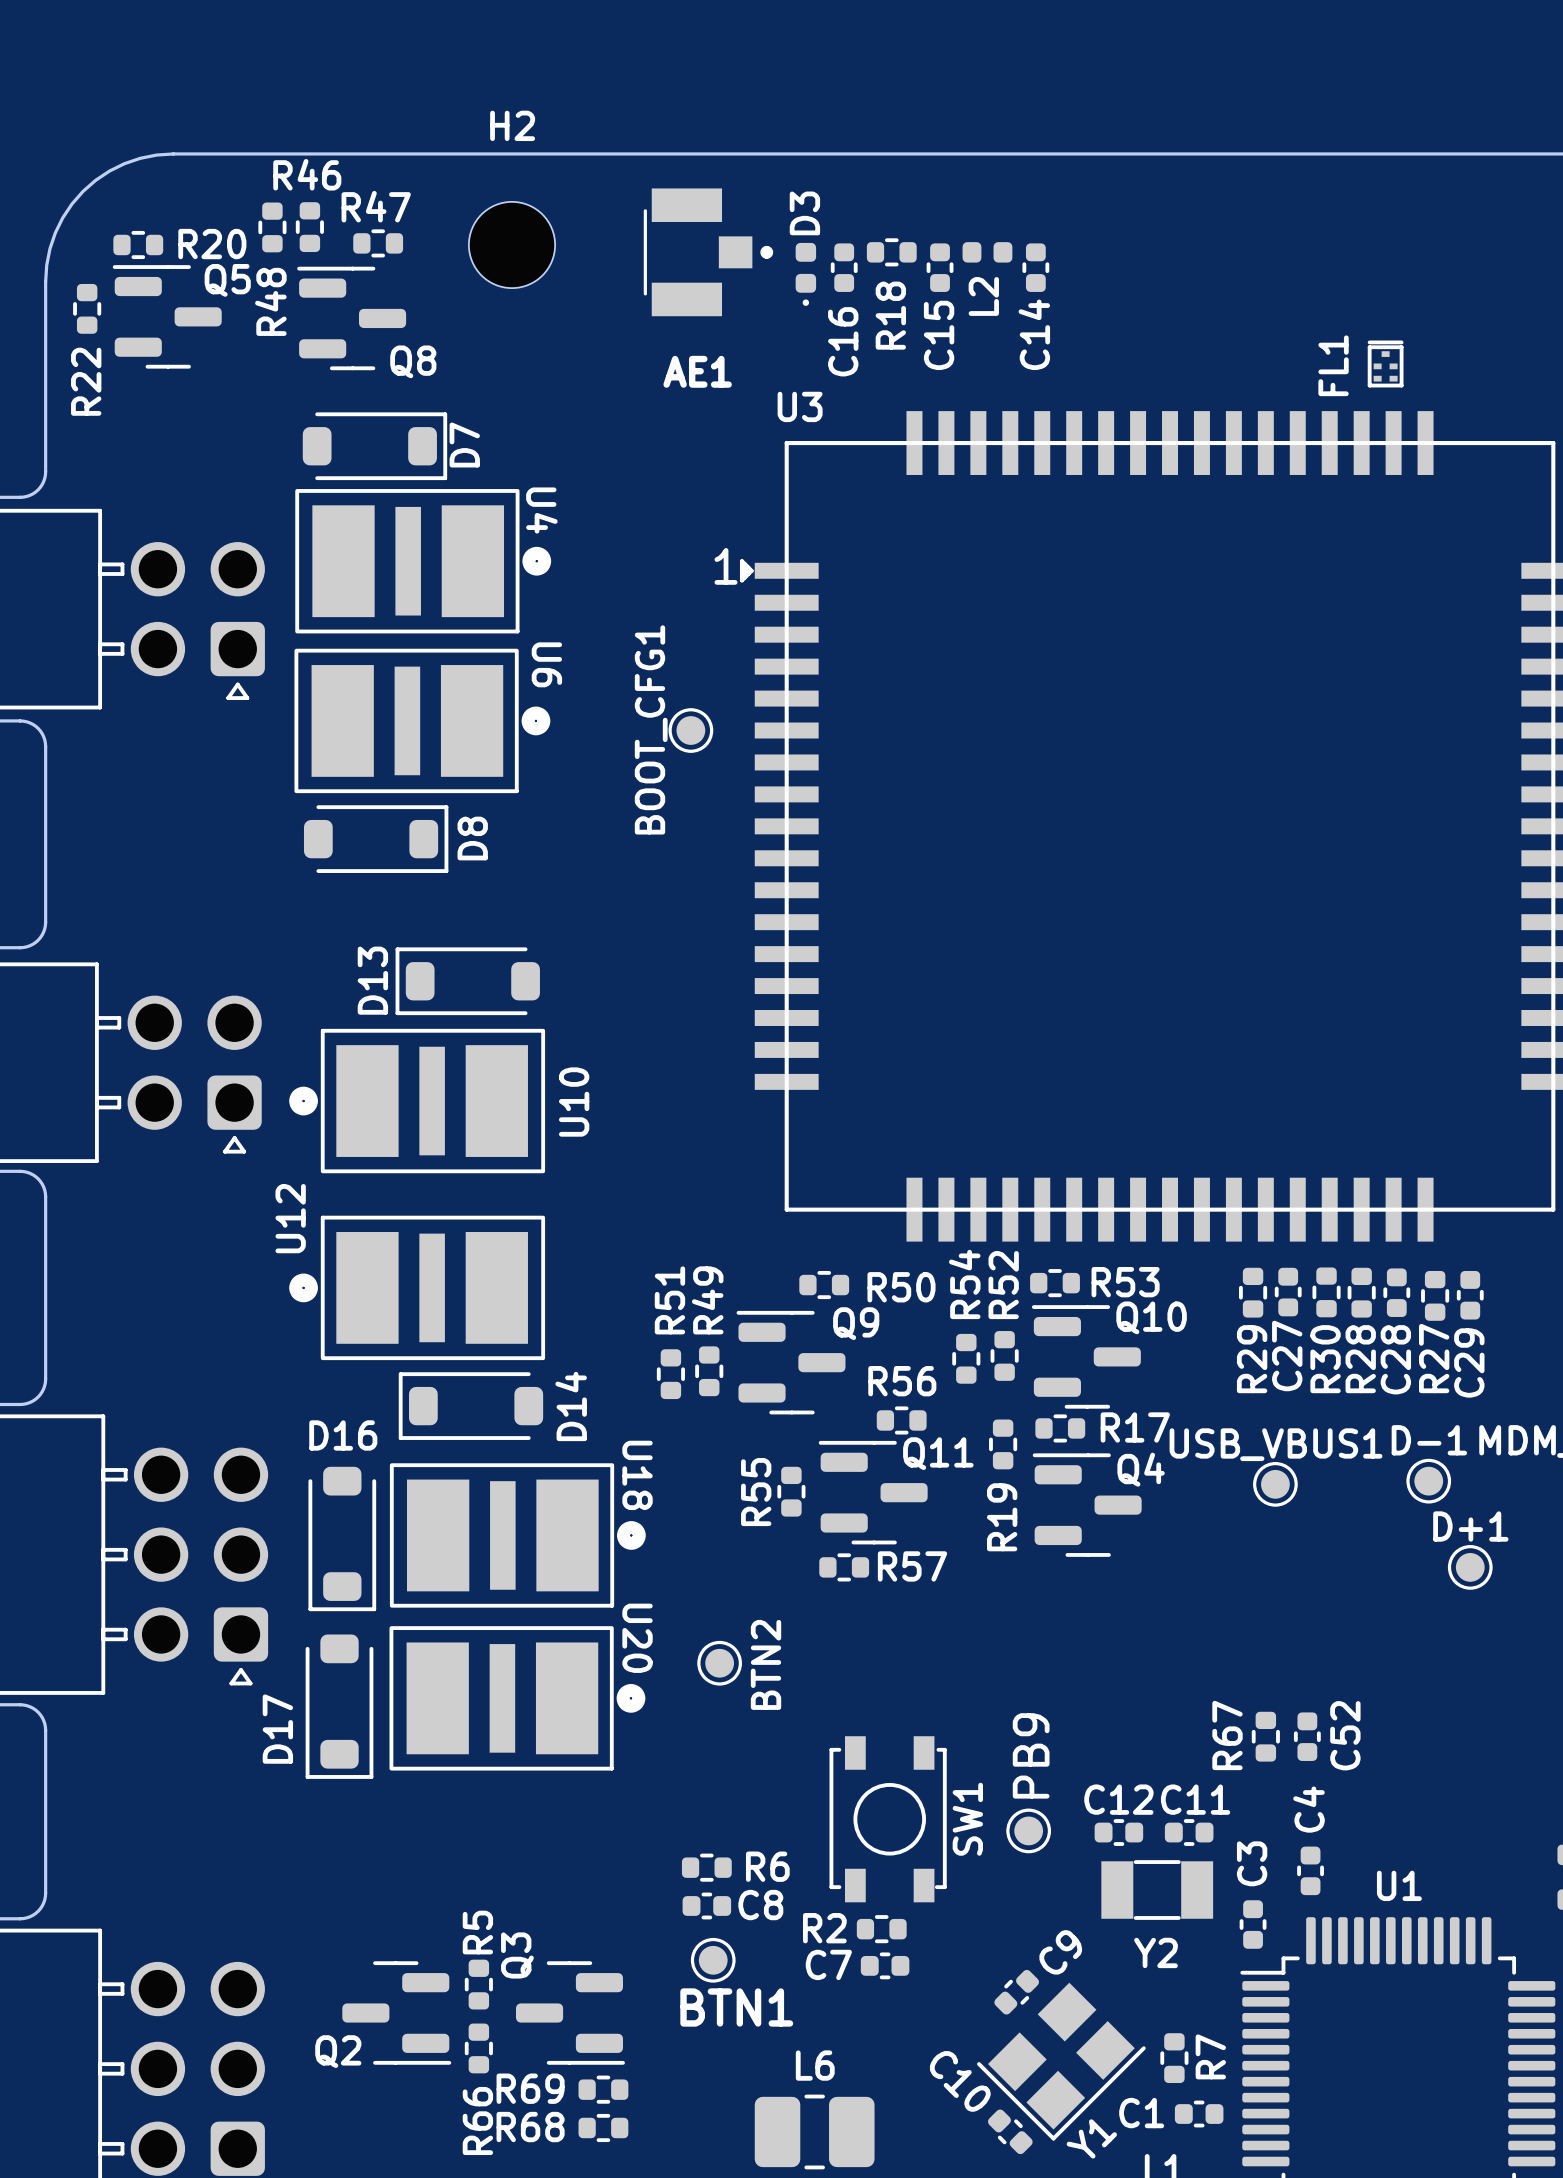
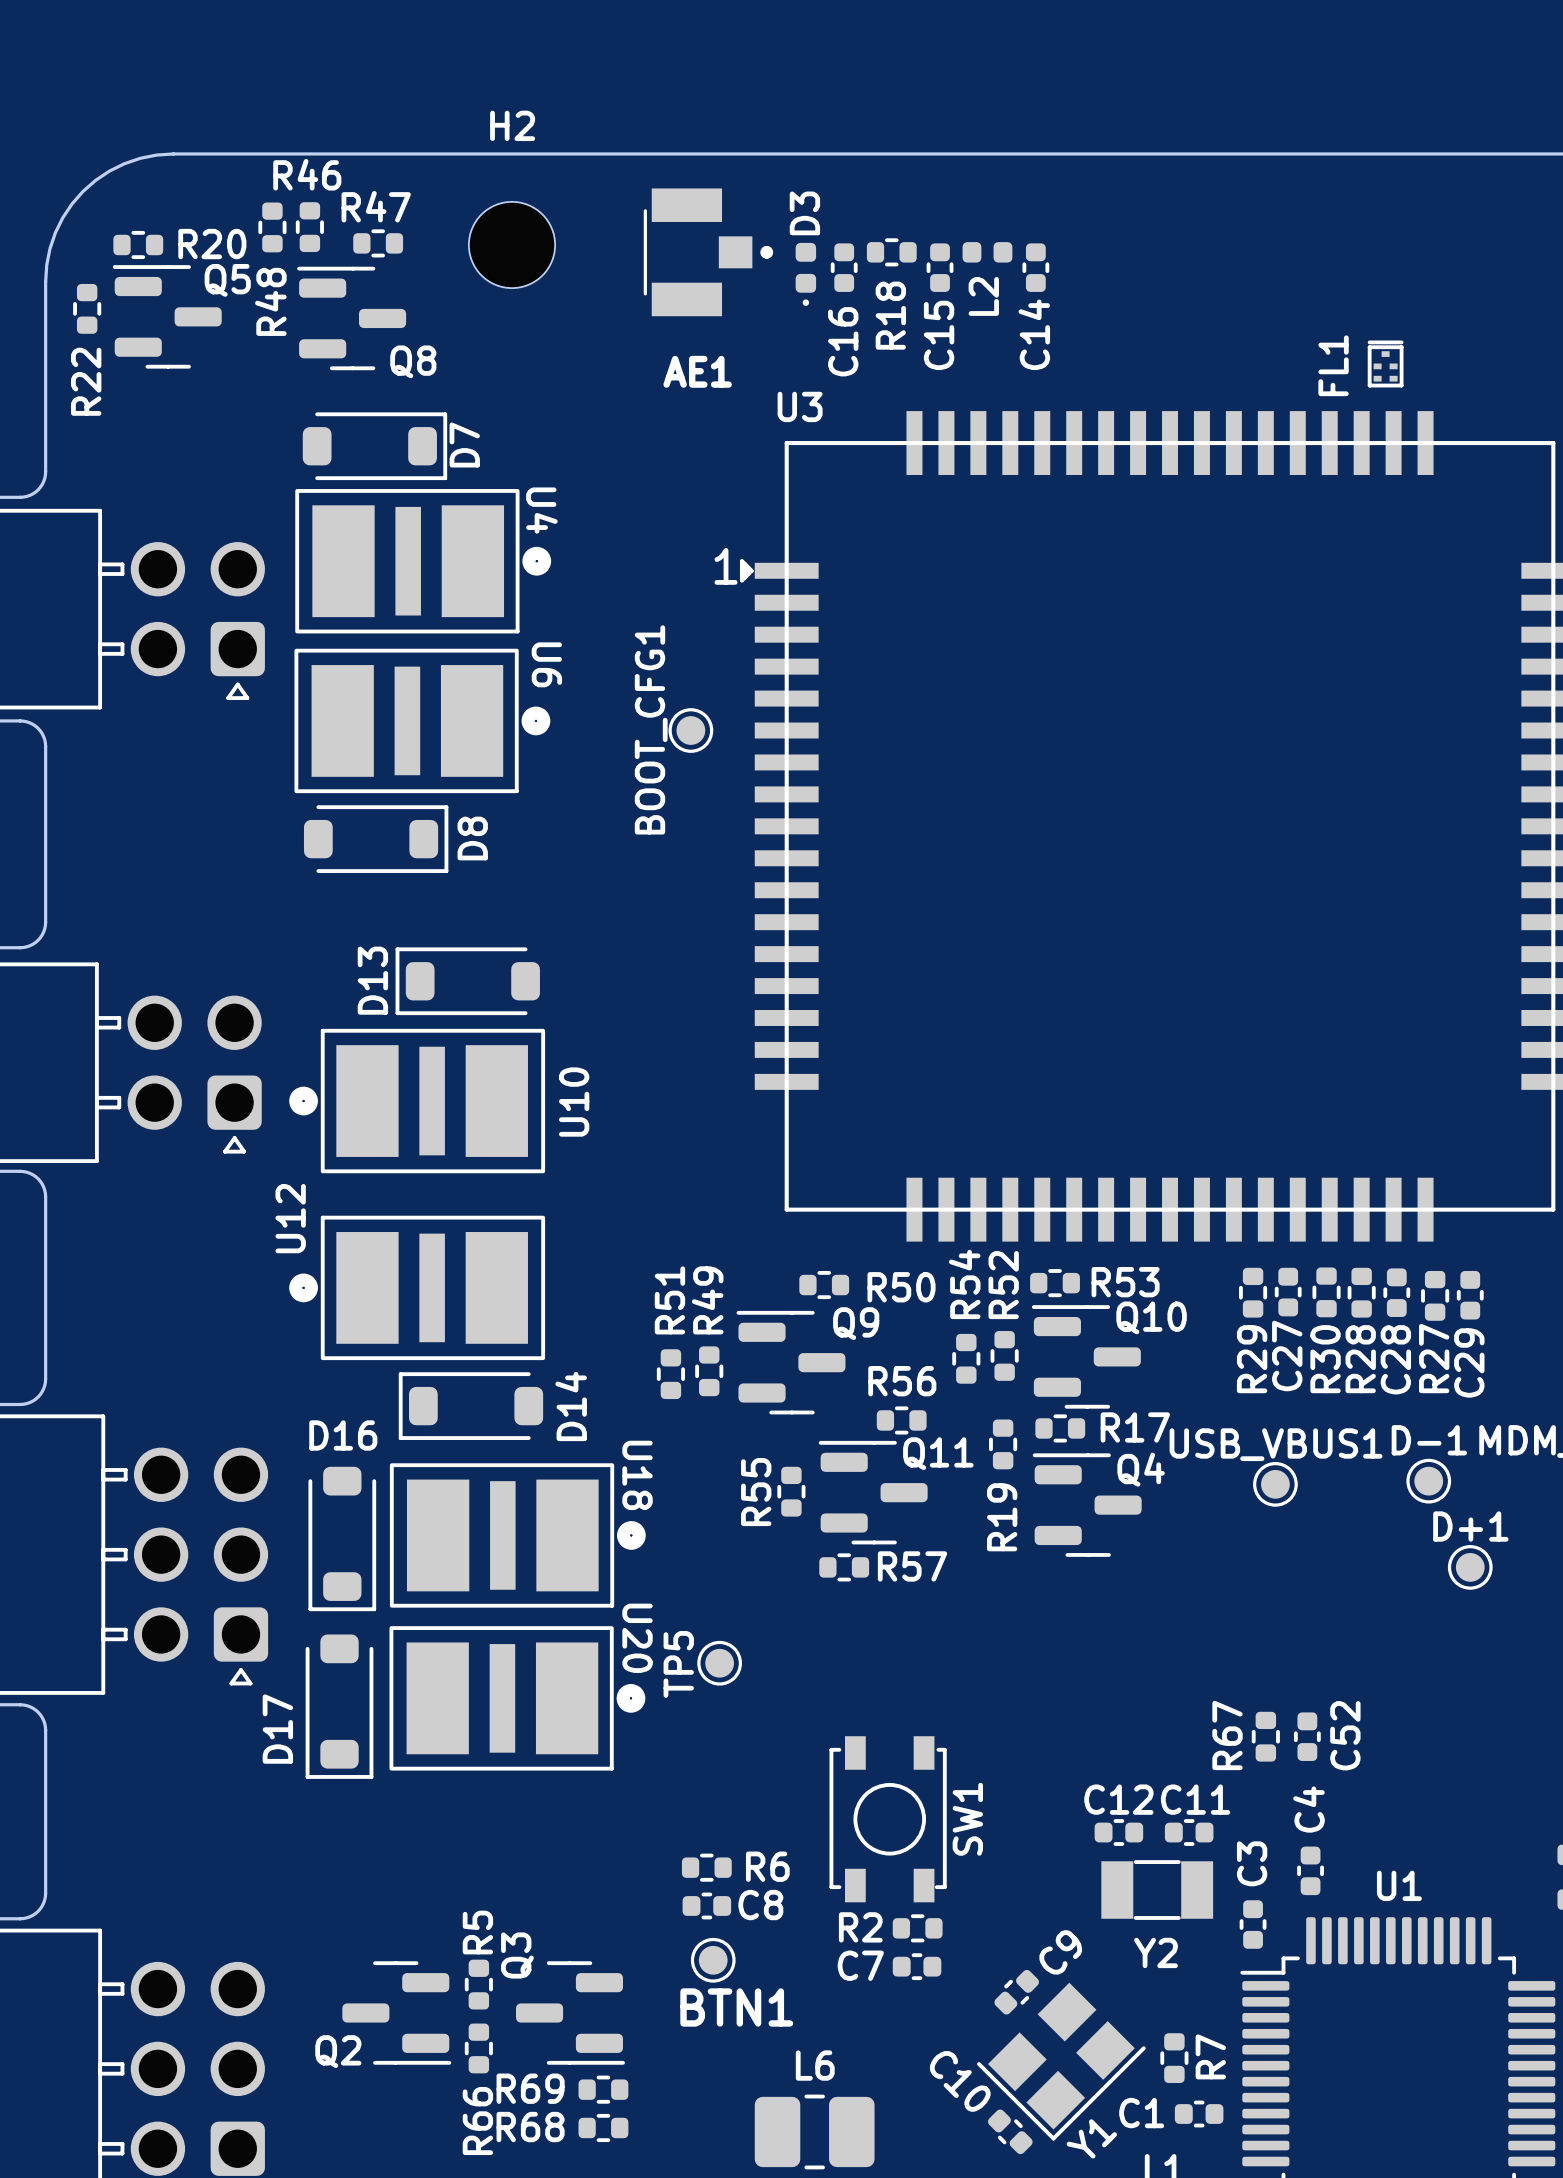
TP5 name: none -> TP5 (678, 1664)
text: BTN2 (766, 1664) -> none
text: PB9 (1031, 1755) -> none
part: (1028, 1830) -> none
R2 position: (881, 1929) -> (917, 1928)
C7 position: (885, 1965) -> (917, 1966)

